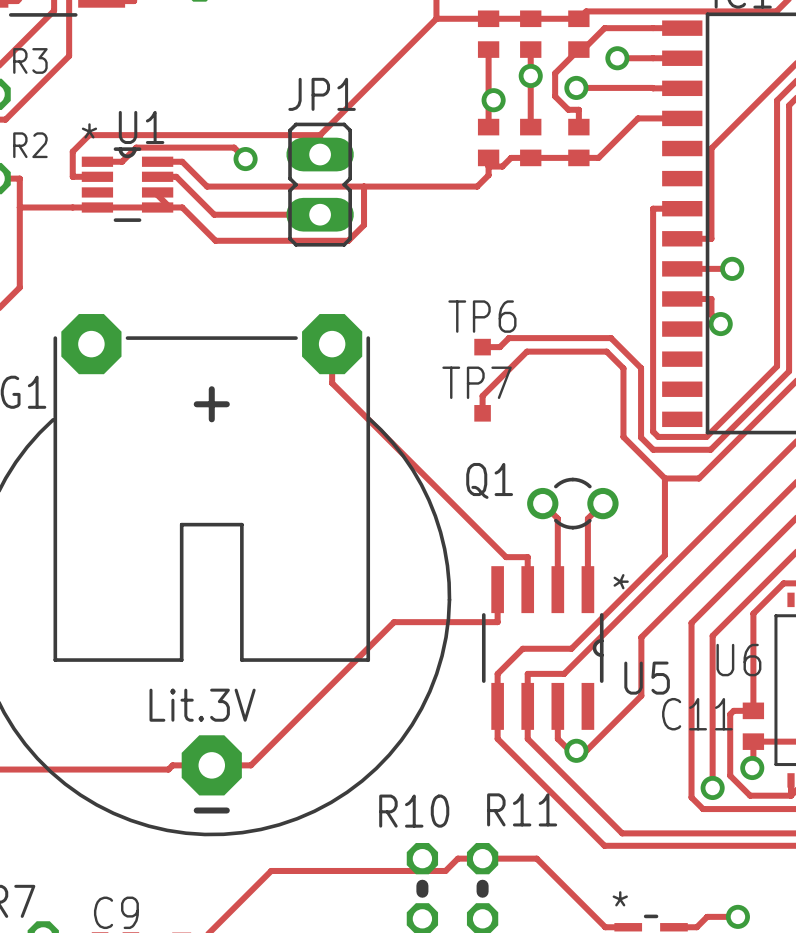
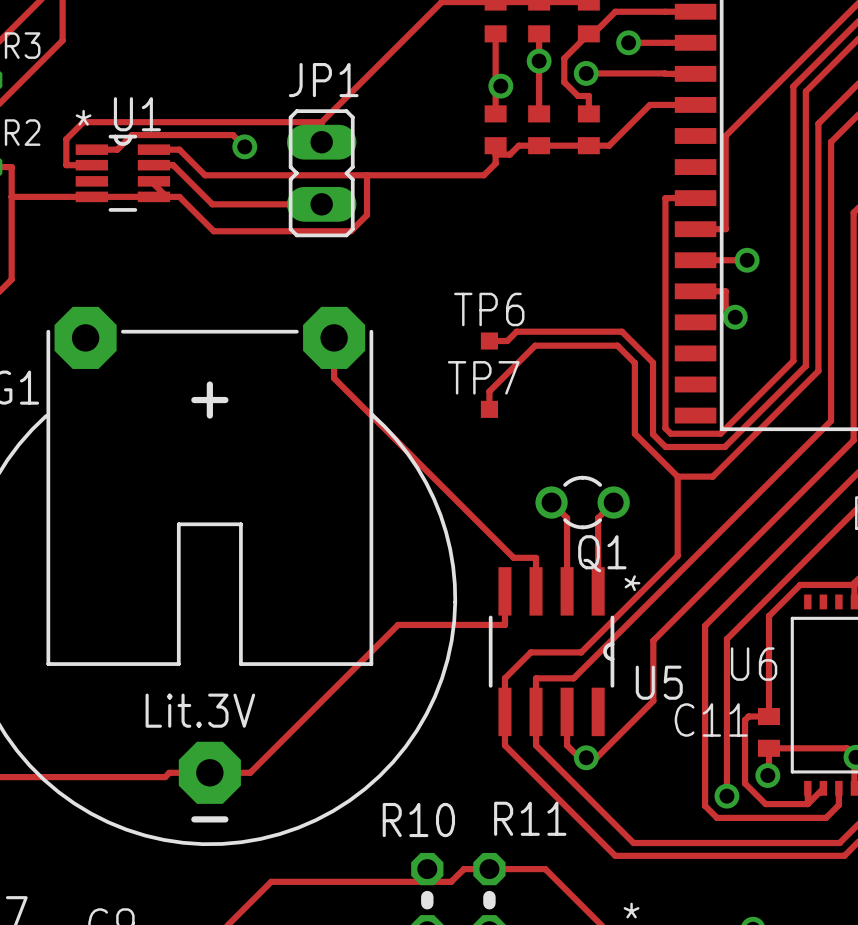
Q1 name position: Q1 (489, 480) -> Q1 (602, 553)

